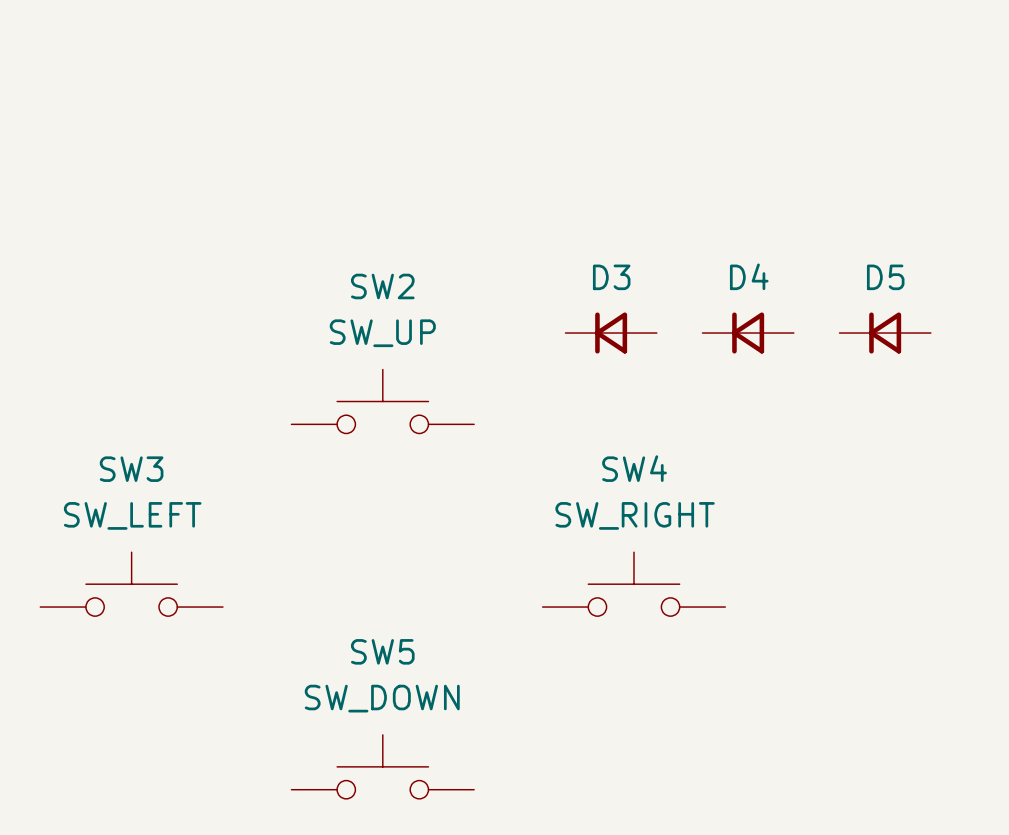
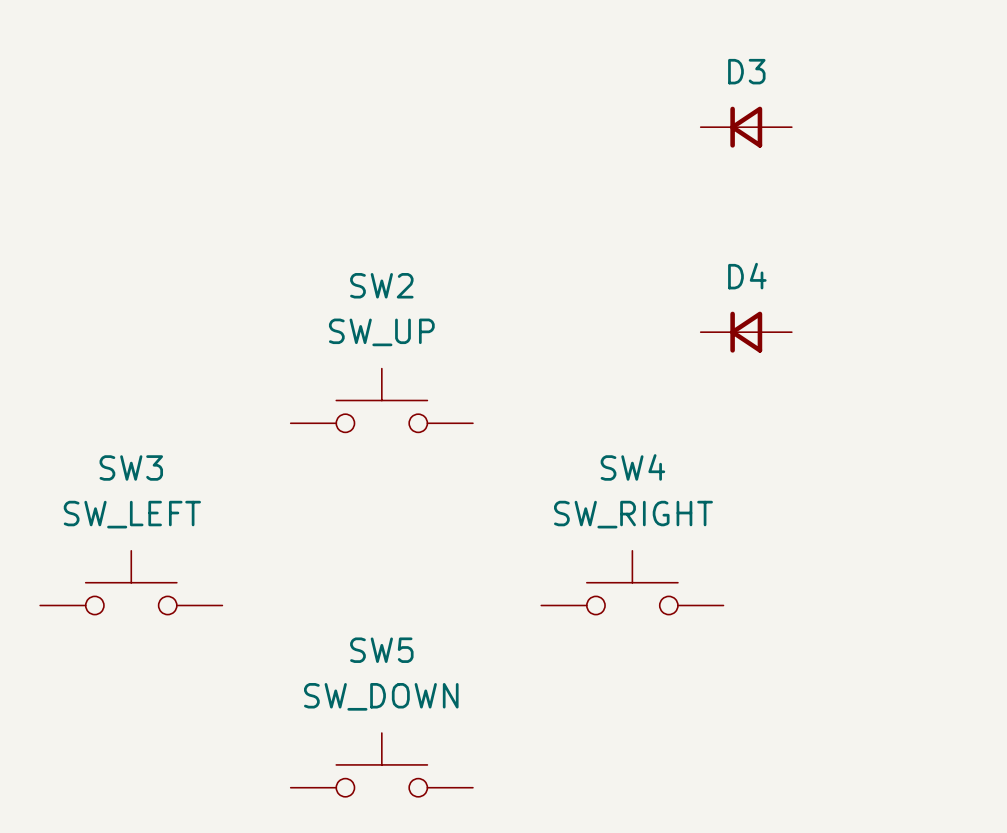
D3 position: (611, 333) -> (746, 127)
D5: (885, 333) -> none

